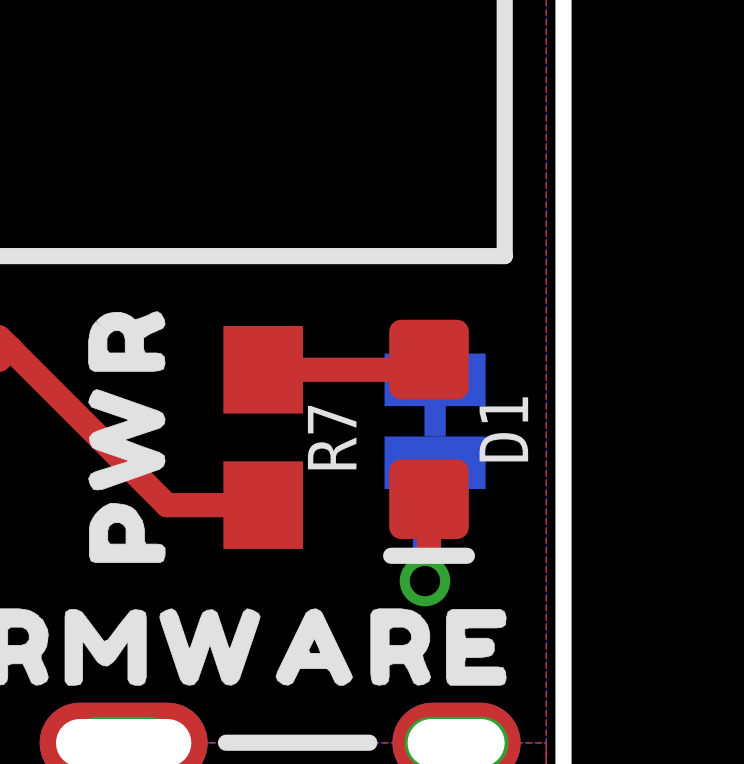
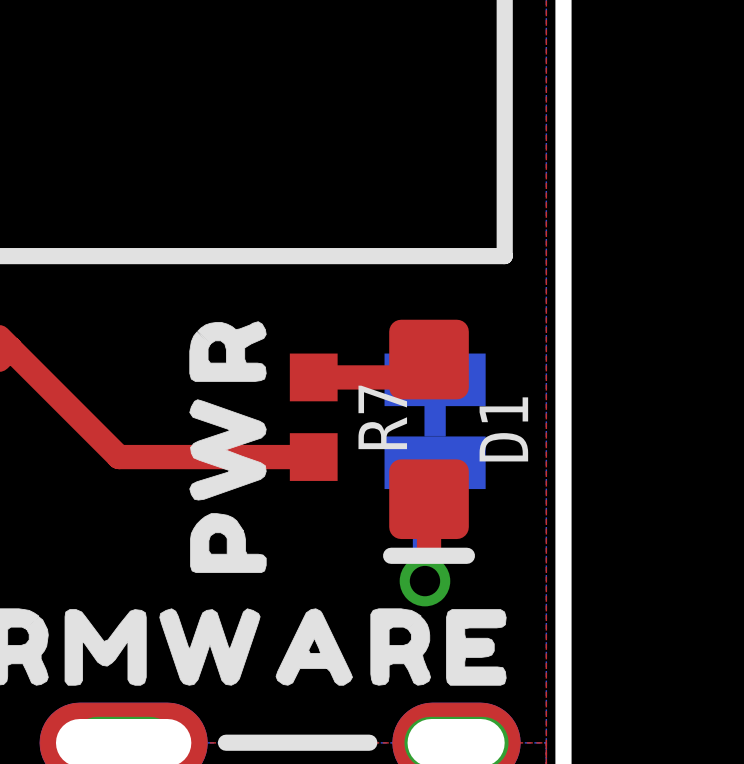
R7 footprint: [223, 325, 303, 549] -> [289, 353, 338, 481]
top track: (263, 369) (418, 369) -> (313, 377) (411, 377) (418, 369)
drawing position: (126, 437) -> (227, 447)
top track: (118, 457) (167, 505) (263, 505) -> (118, 457) (313, 457)

